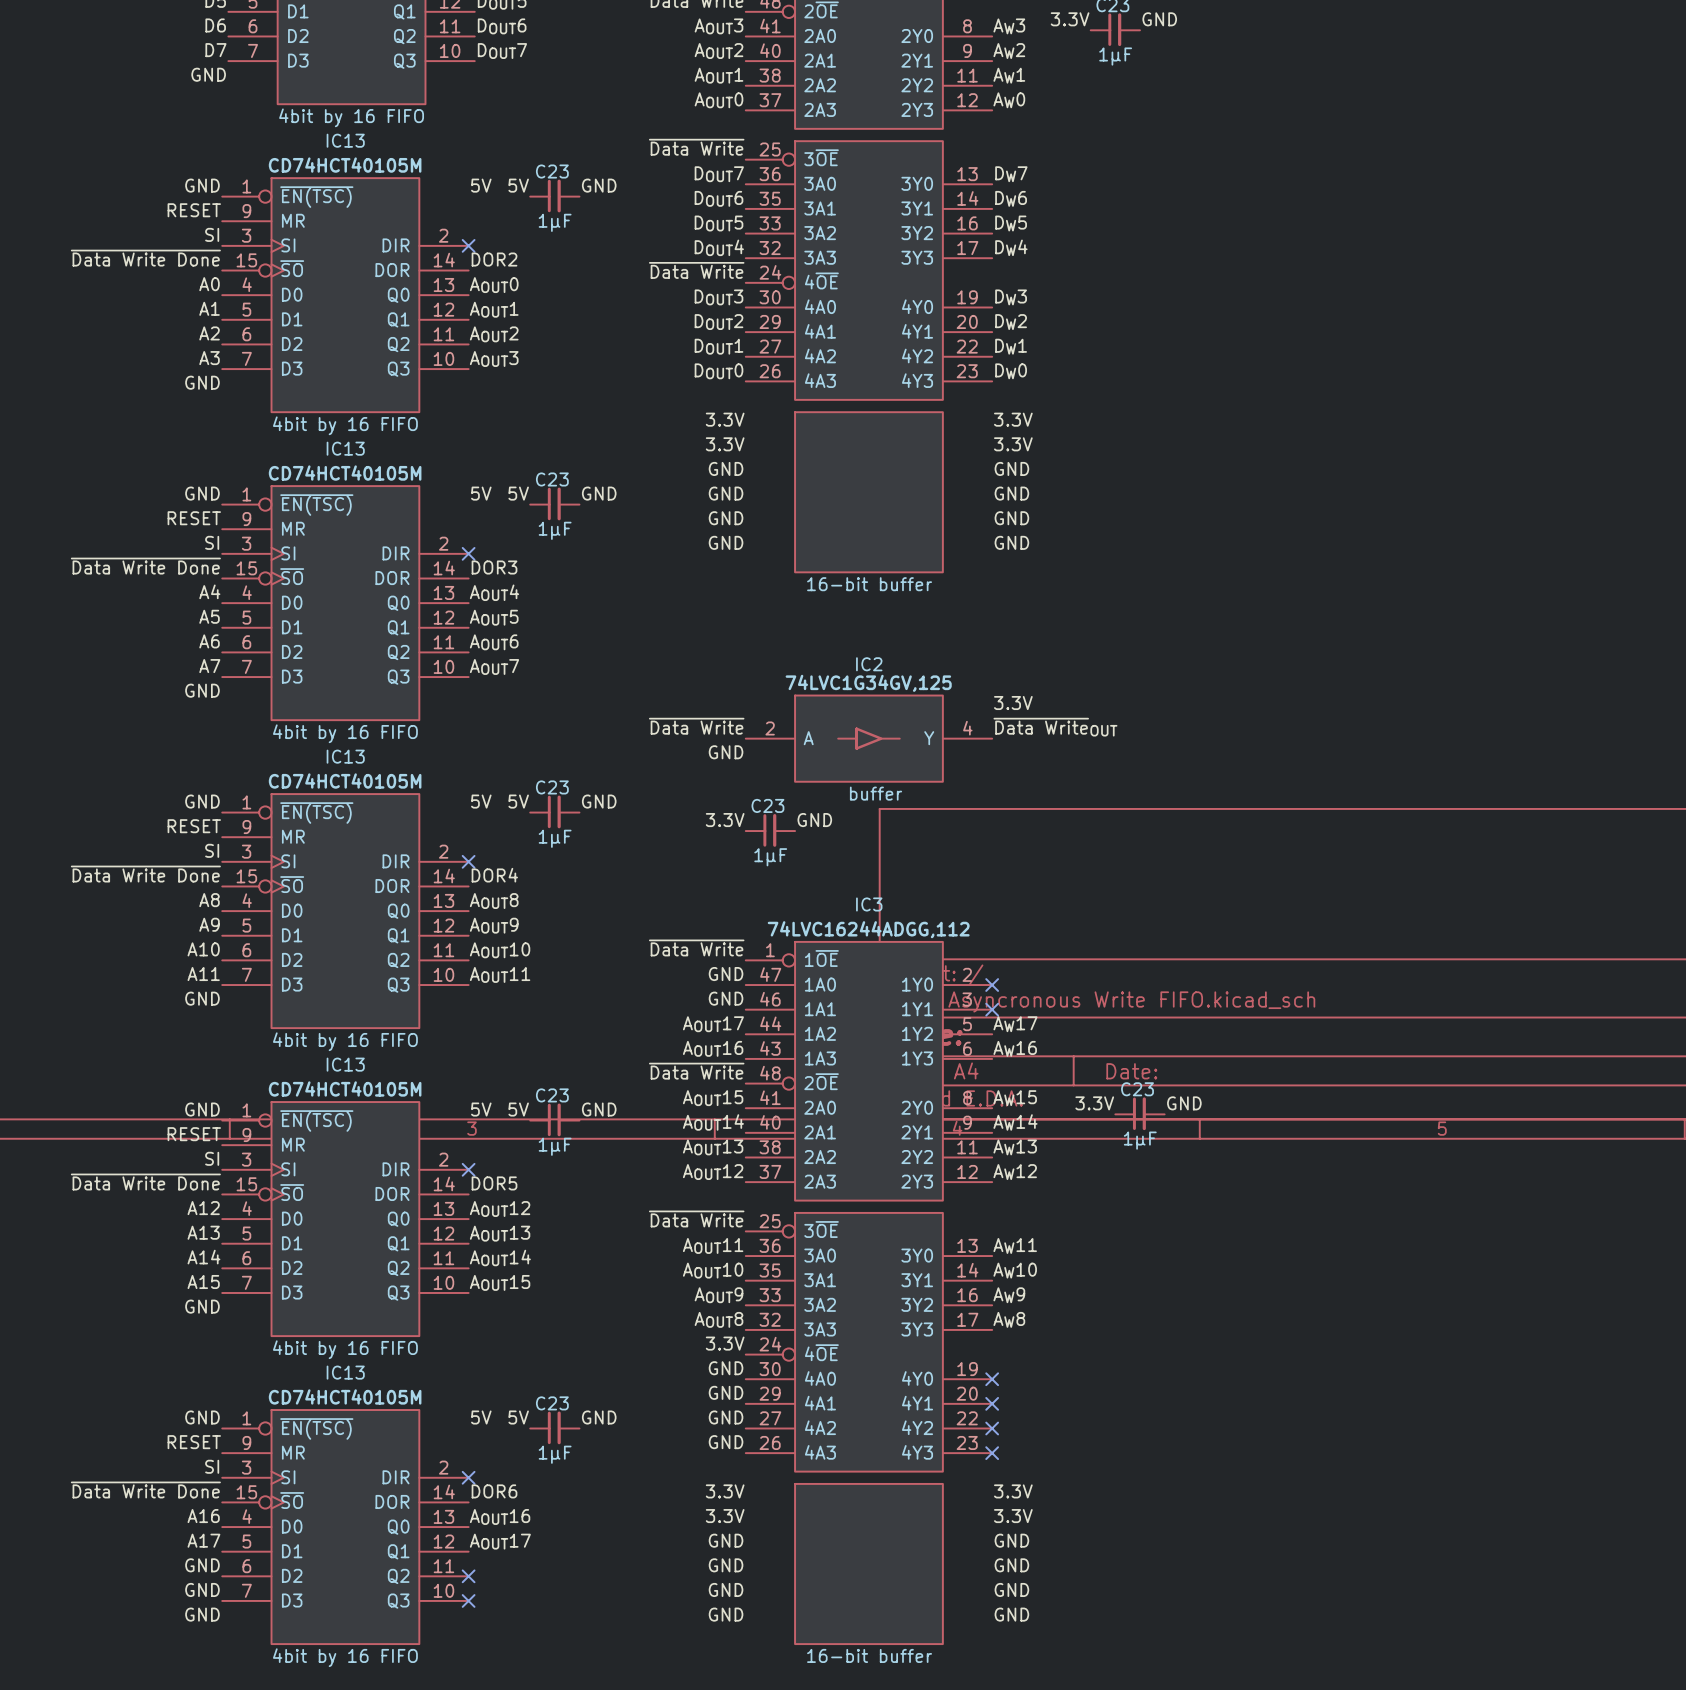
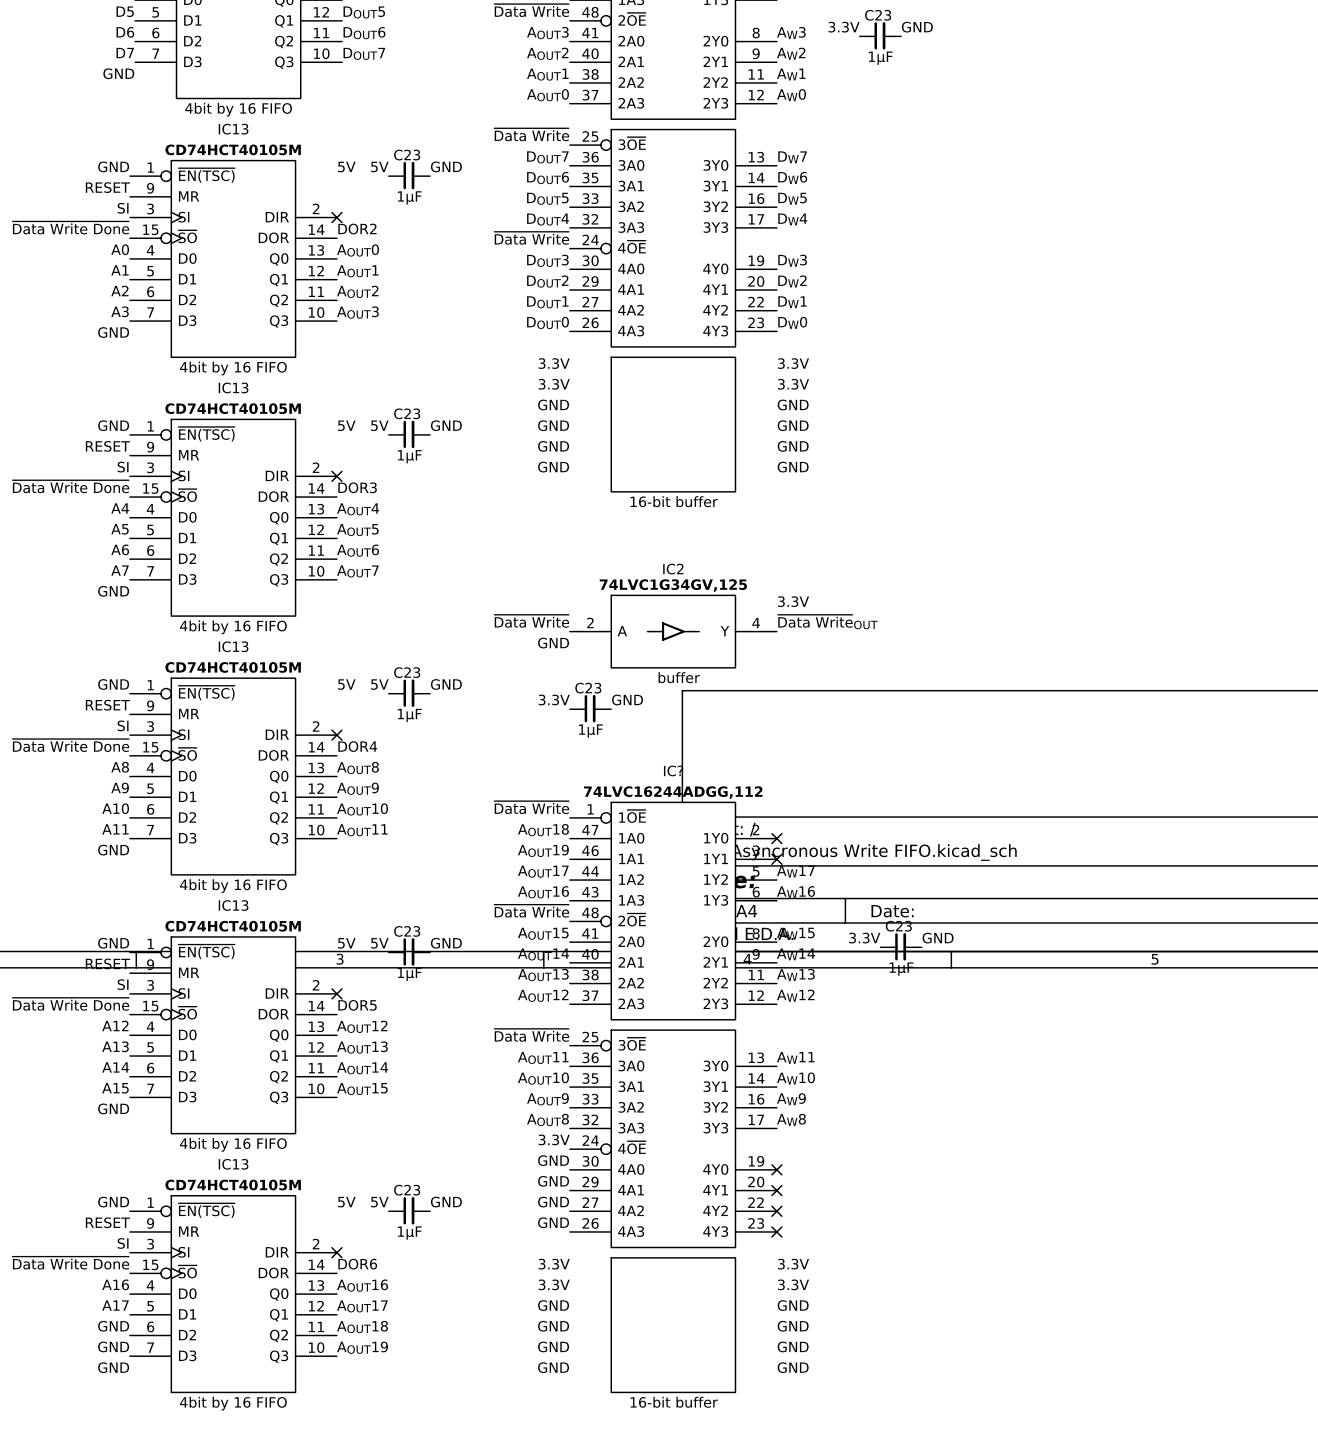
IC3 name: IC3 (869, 904) -> IC? (673, 770)
label: GND (726, 974) -> AOUT18 (543, 830)
label: GND (726, 998) -> AOUT19 (543, 850)
label: none -> AOUT18 (362, 1327)
no-connect mark: (468, 1576) -> none
label: none -> AOUT19 (362, 1347)
no-connect mark: (468, 1600) -> none

